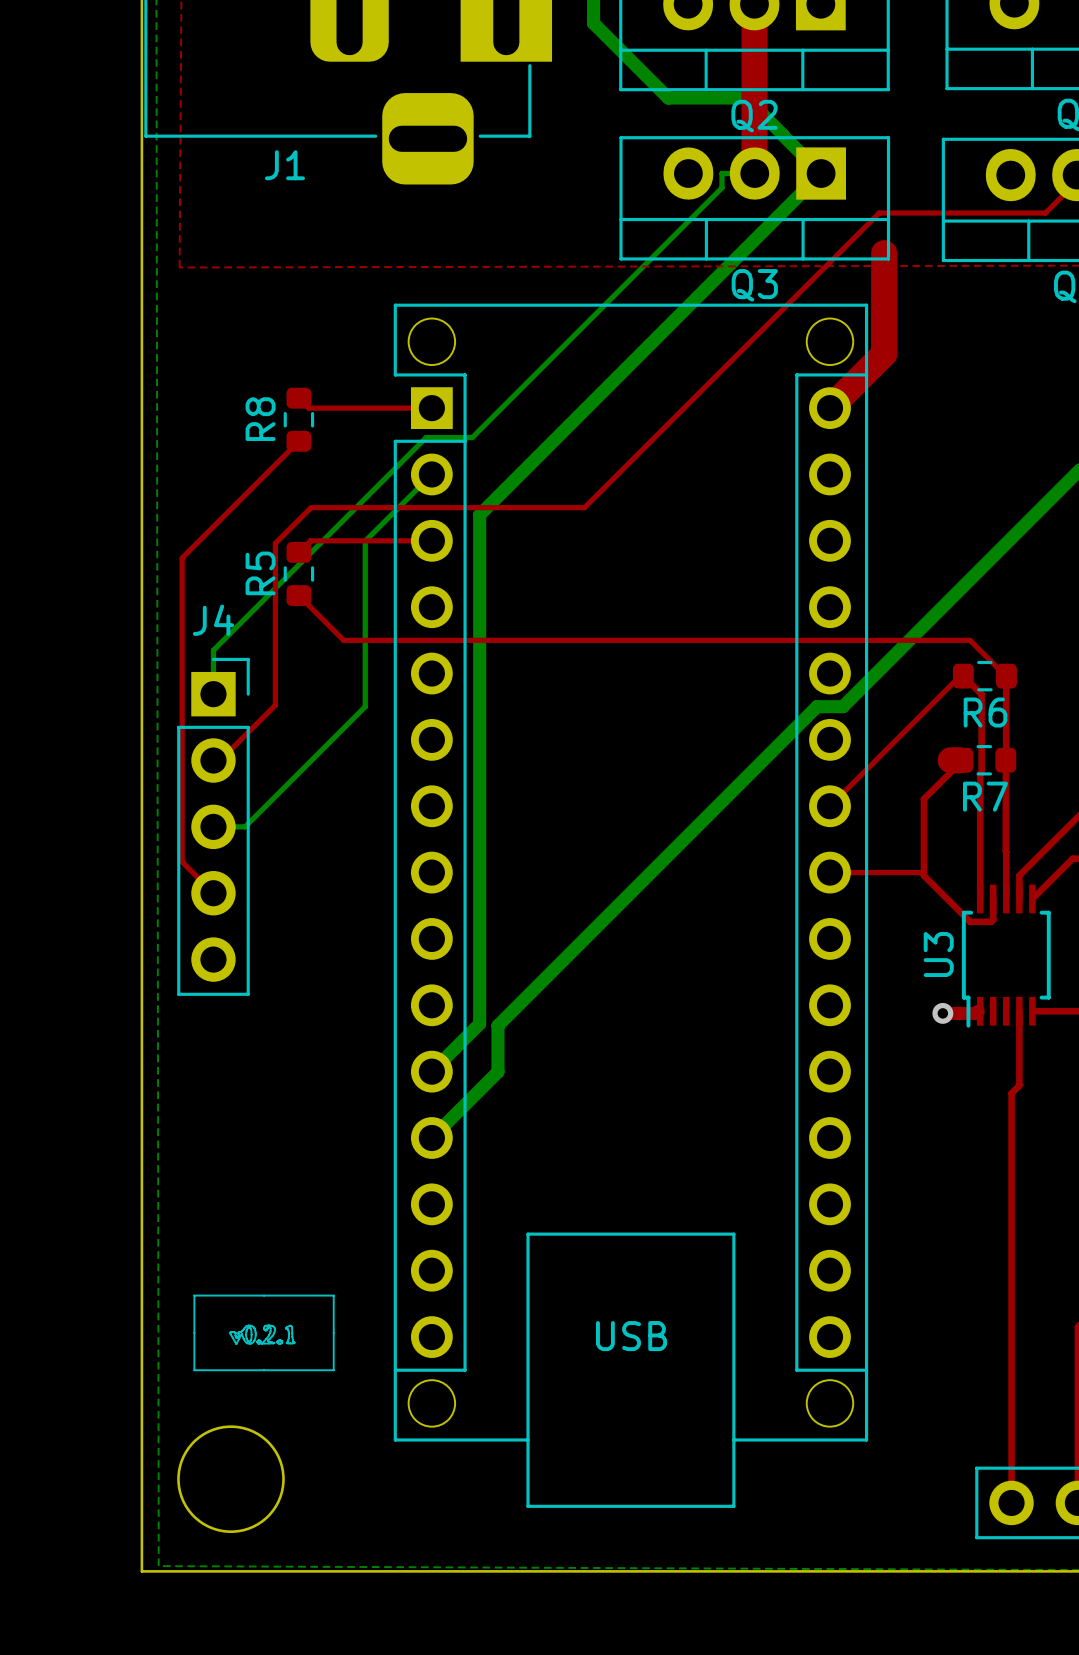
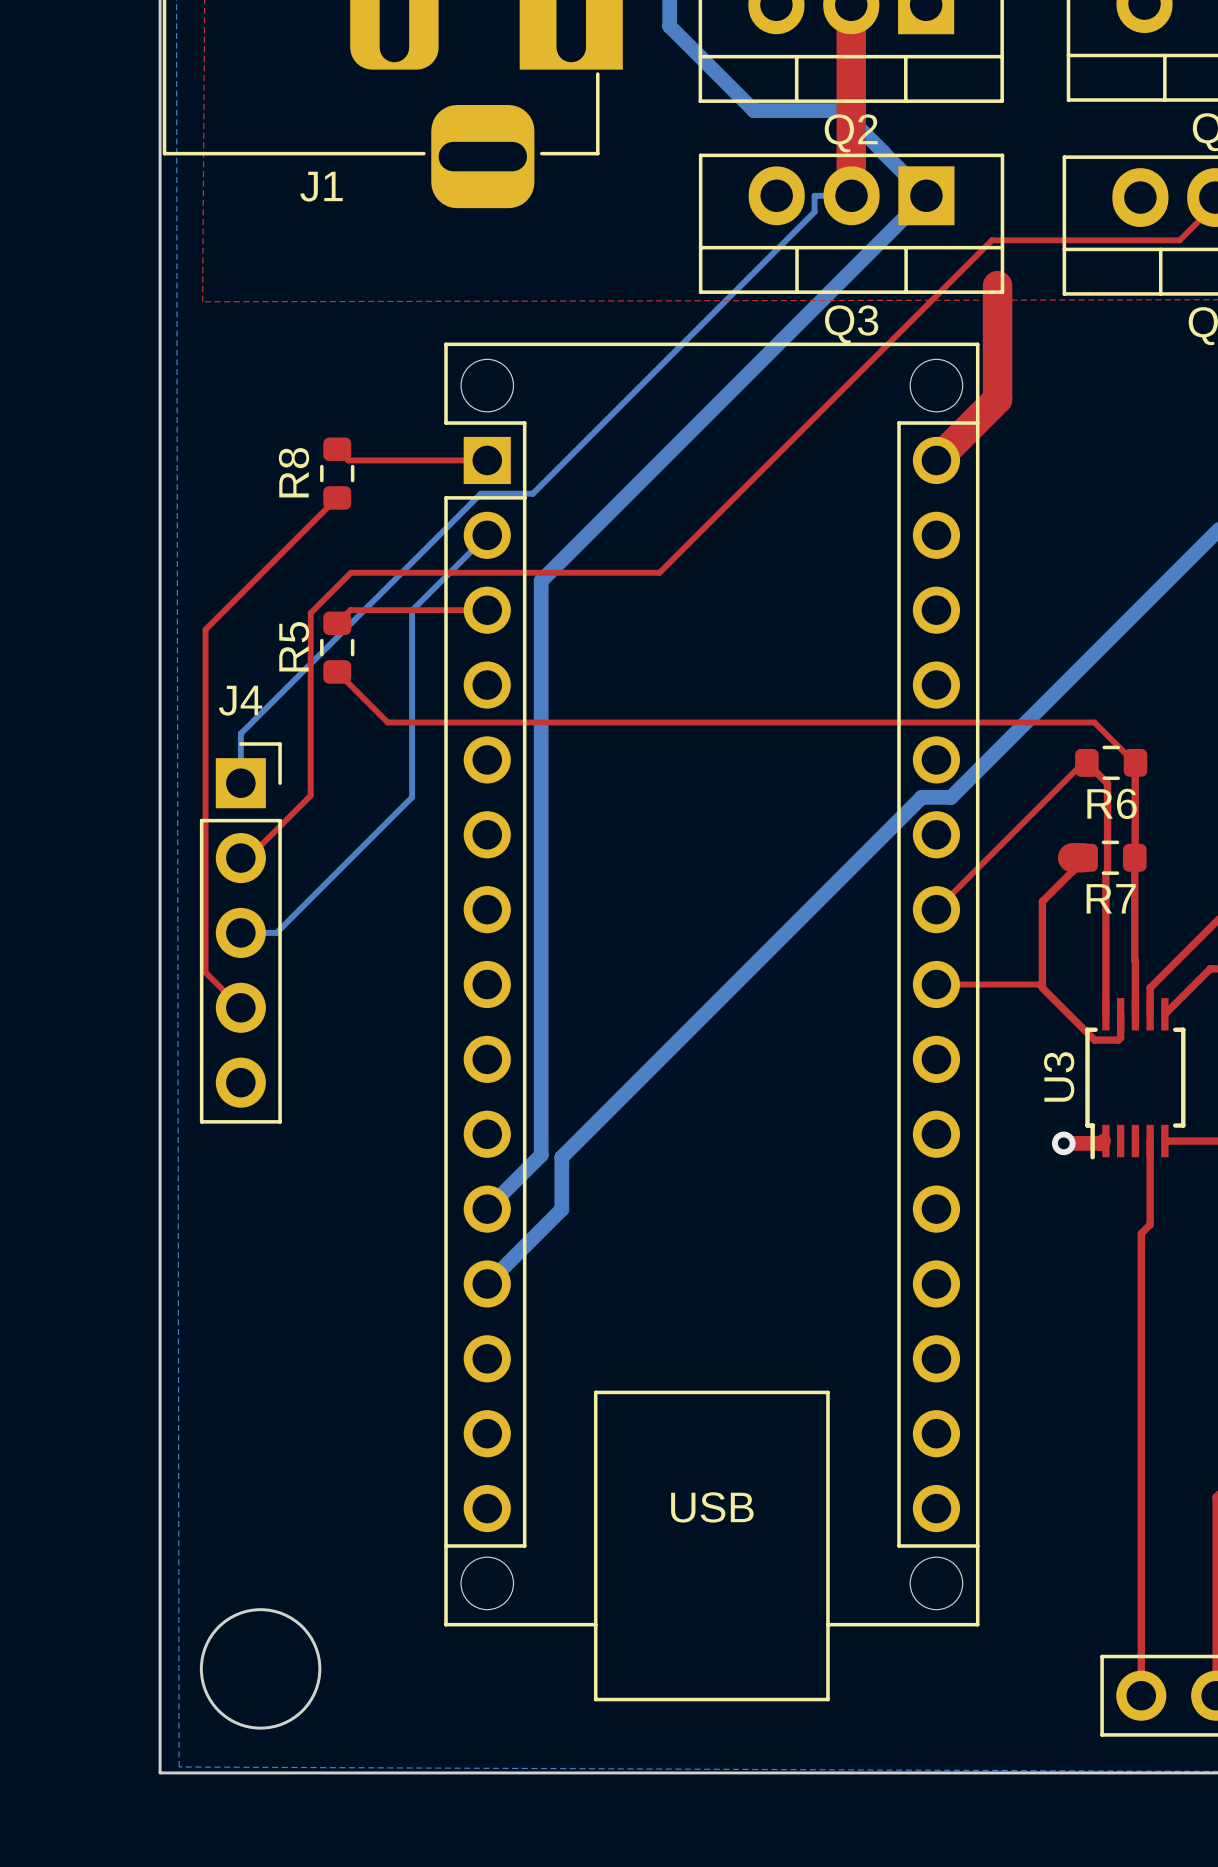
line: (194, 1295) (333, 1295) (333, 1370) (194, 1370) (194, 1295) -> none
line: (248, 1325) (238, 1332) (237, 1337) (235, 1332) (230, 1332) (236, 1344) (241, 1333) (247, 1343) (254, 1340) (254, 1329) (248, 1325) -> none
line: (268, 1325) (273, 1326) (275, 1329) (268, 1340) (274, 1343) (261, 1343) (269, 1333) (270, 1327) (266, 1330) (264, 1328) (268, 1325) -> none
line: (289, 1325) (285, 1328) (288, 1333) (286, 1342) (294, 1343) (292, 1327) (289, 1325) -> none
line: (248, 1327) (246, 1334) (249, 1341) (251, 1334) (251, 1328) (248, 1327) -> none
line: (258, 1340) (257, 1342) (259, 1343) (260, 1341) (258, 1340) -> none
line: (278, 1340) (278, 1343) (282, 1342) (281, 1340) (278, 1340) -> none

